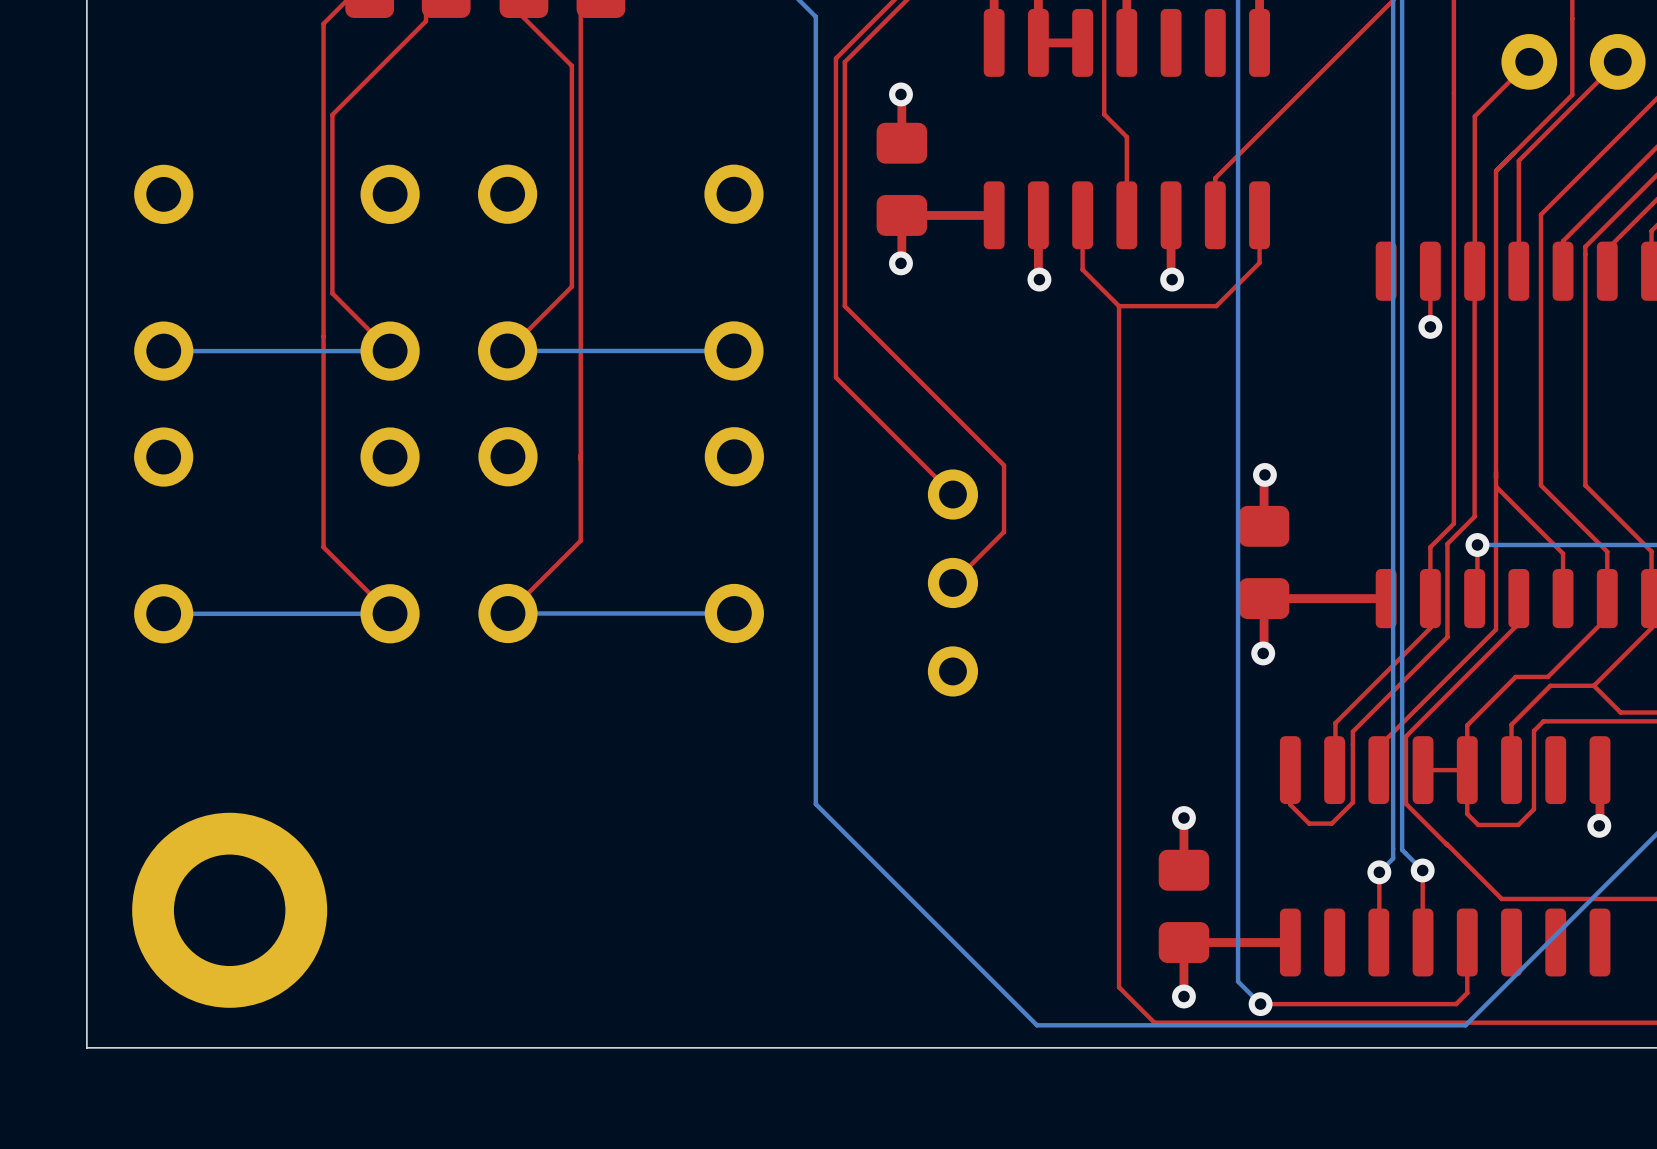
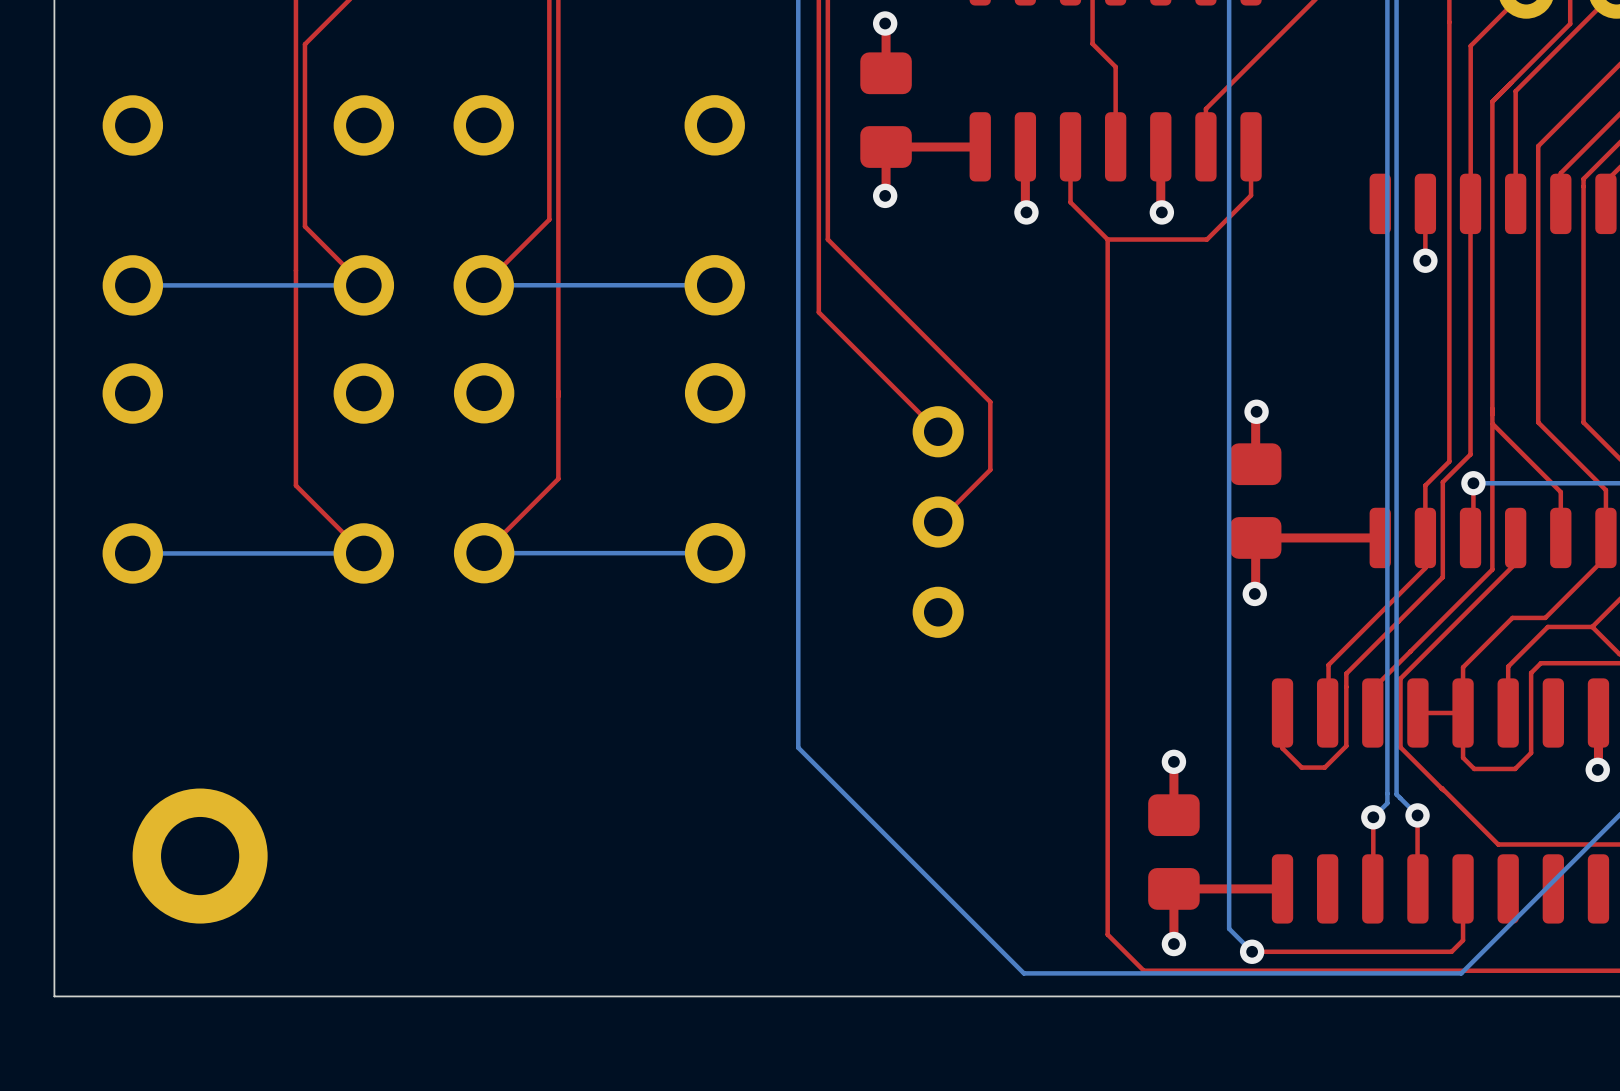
part footprint: [132, 812, 328, 1008] -> [132, 788, 268, 924]

